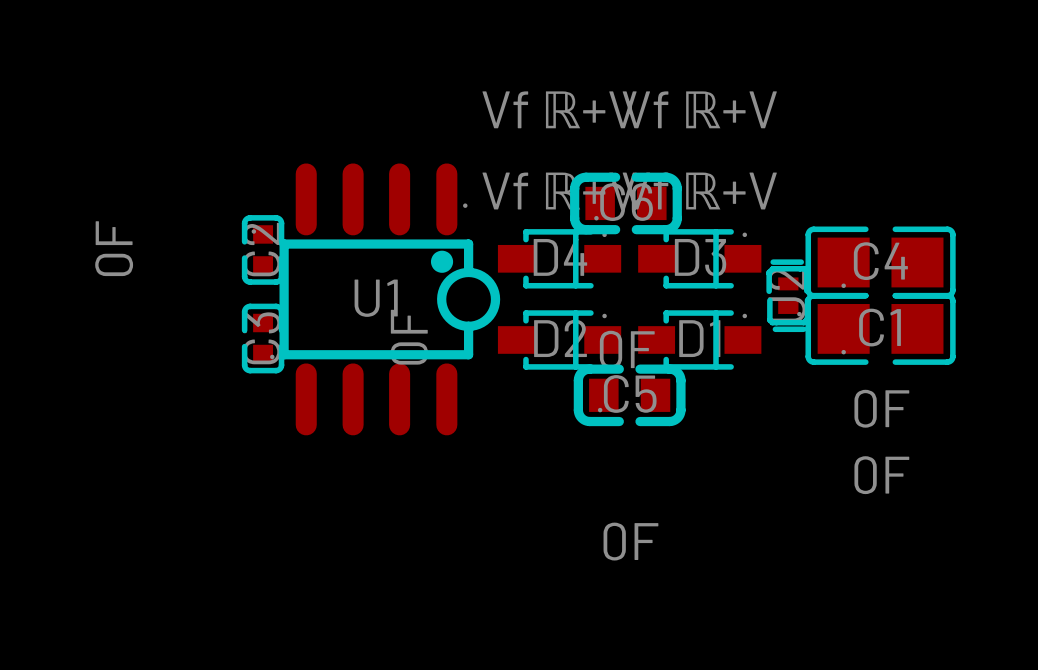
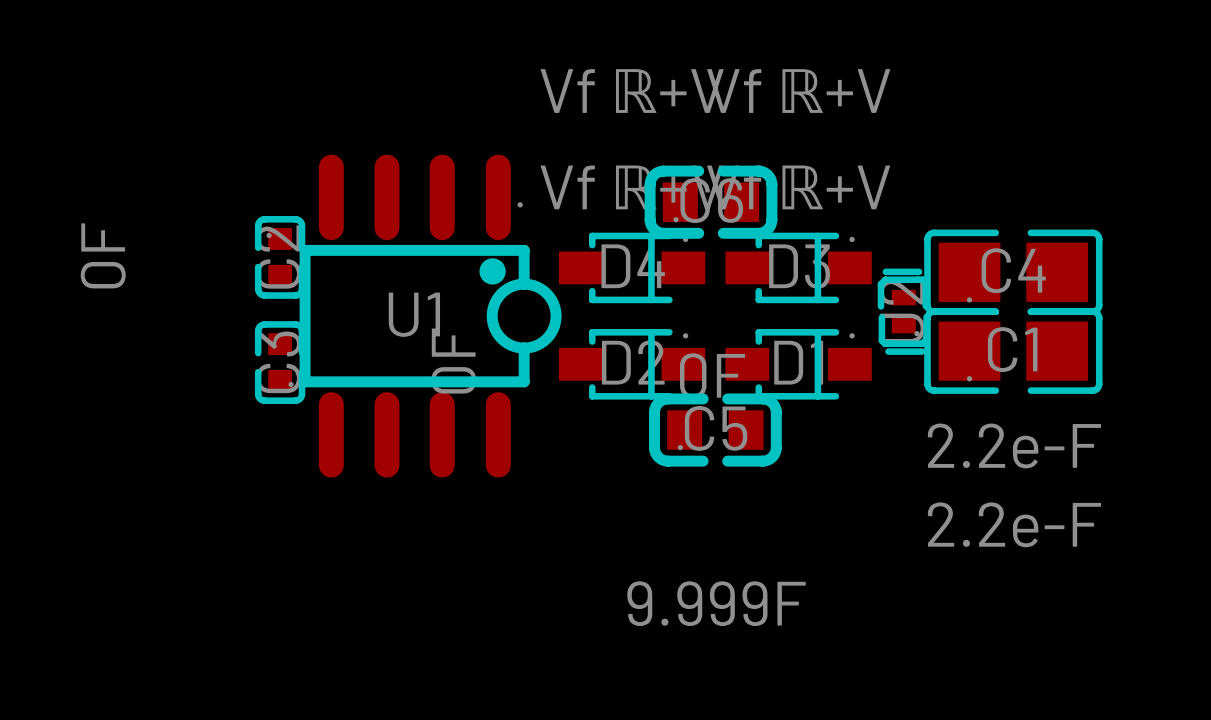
C4 value: 0F (881, 408) -> 2.2e-F (1014, 445)
C1 value: 0F (881, 475) -> 2.2e-F (1014, 524)
C5 value: 0F (630, 541) -> 9.999F (716, 603)

